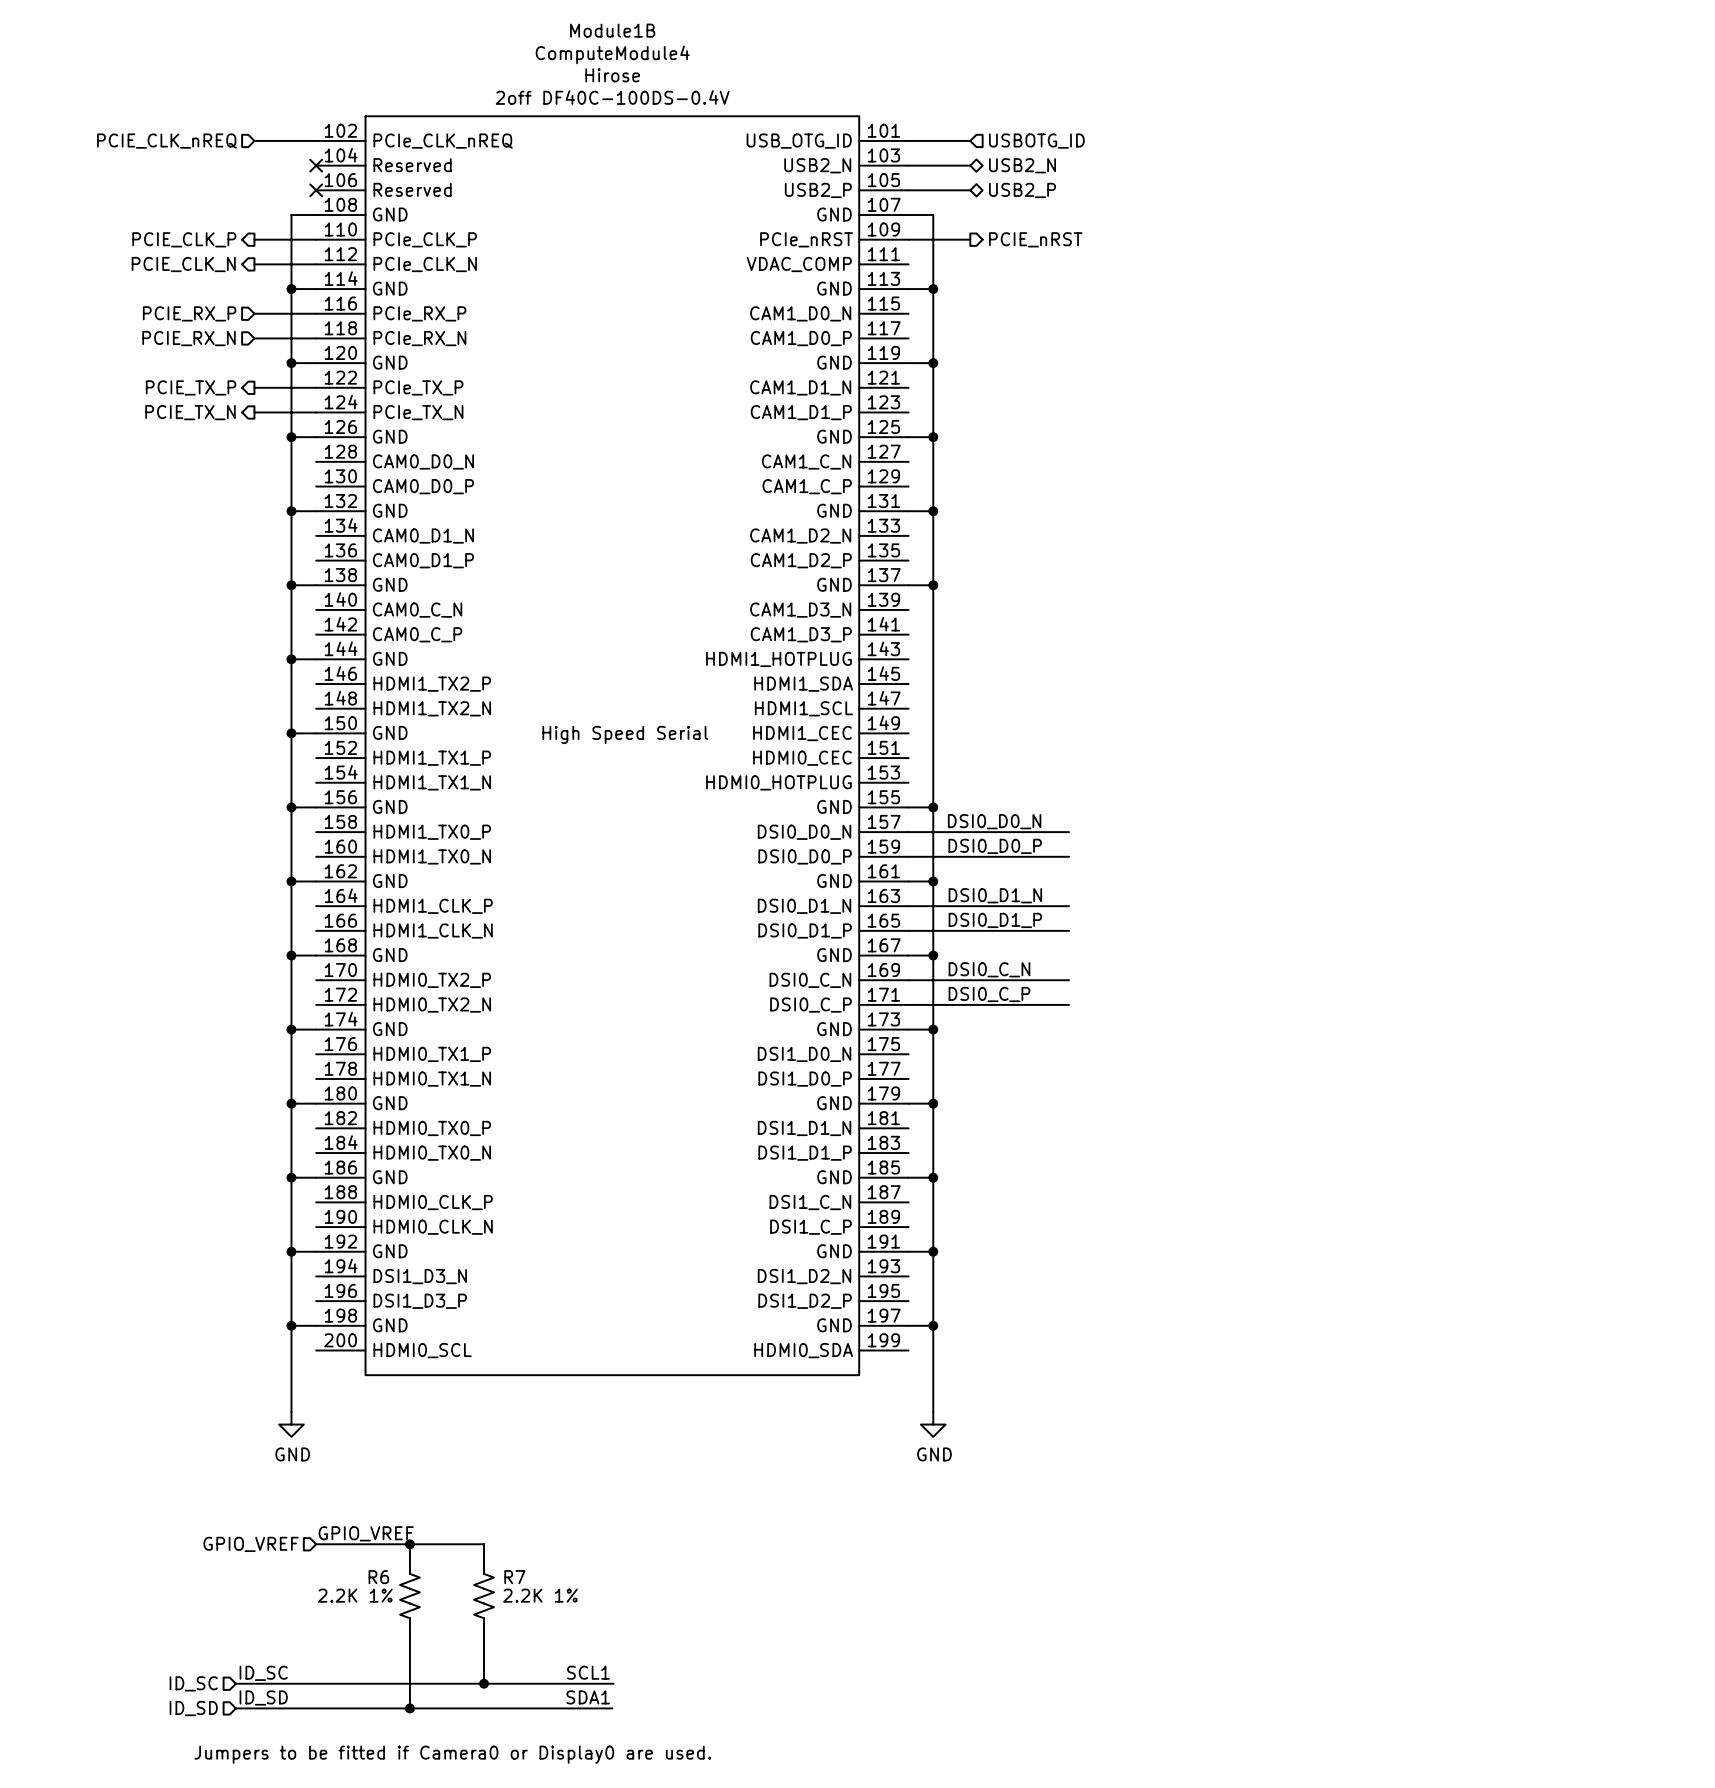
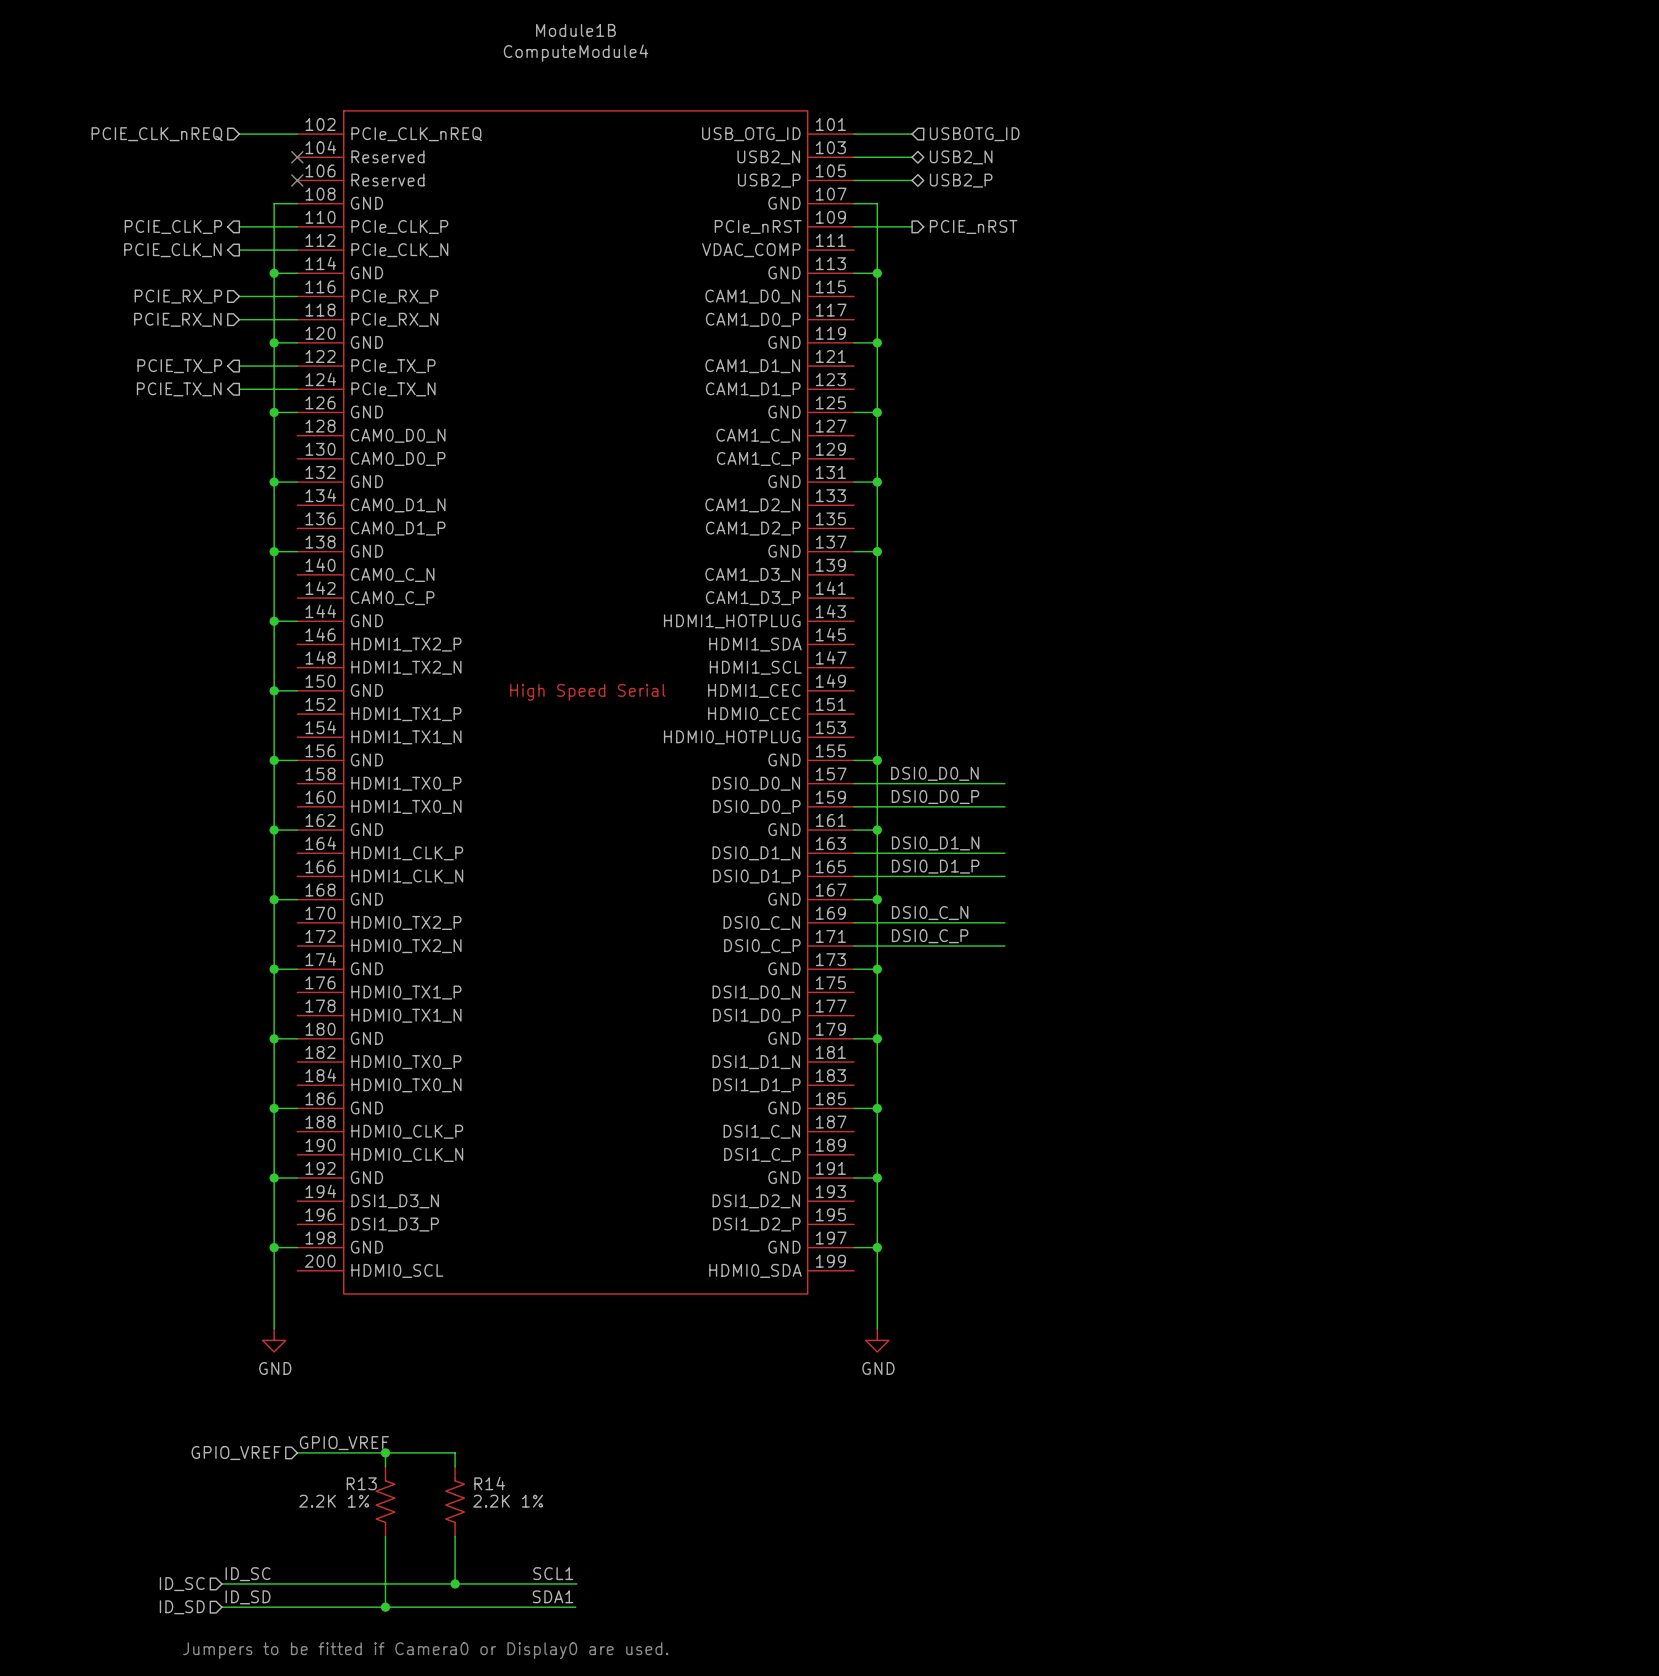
Module1B text: Hirose (612, 75) -> none
Module1B text: 2off DF40C-100DS-0.4V (612, 97) -> none
R6 name: R6 (378, 1577) -> R13 (361, 1483)
R7 name: R7 (514, 1577) -> R14 (489, 1483)

